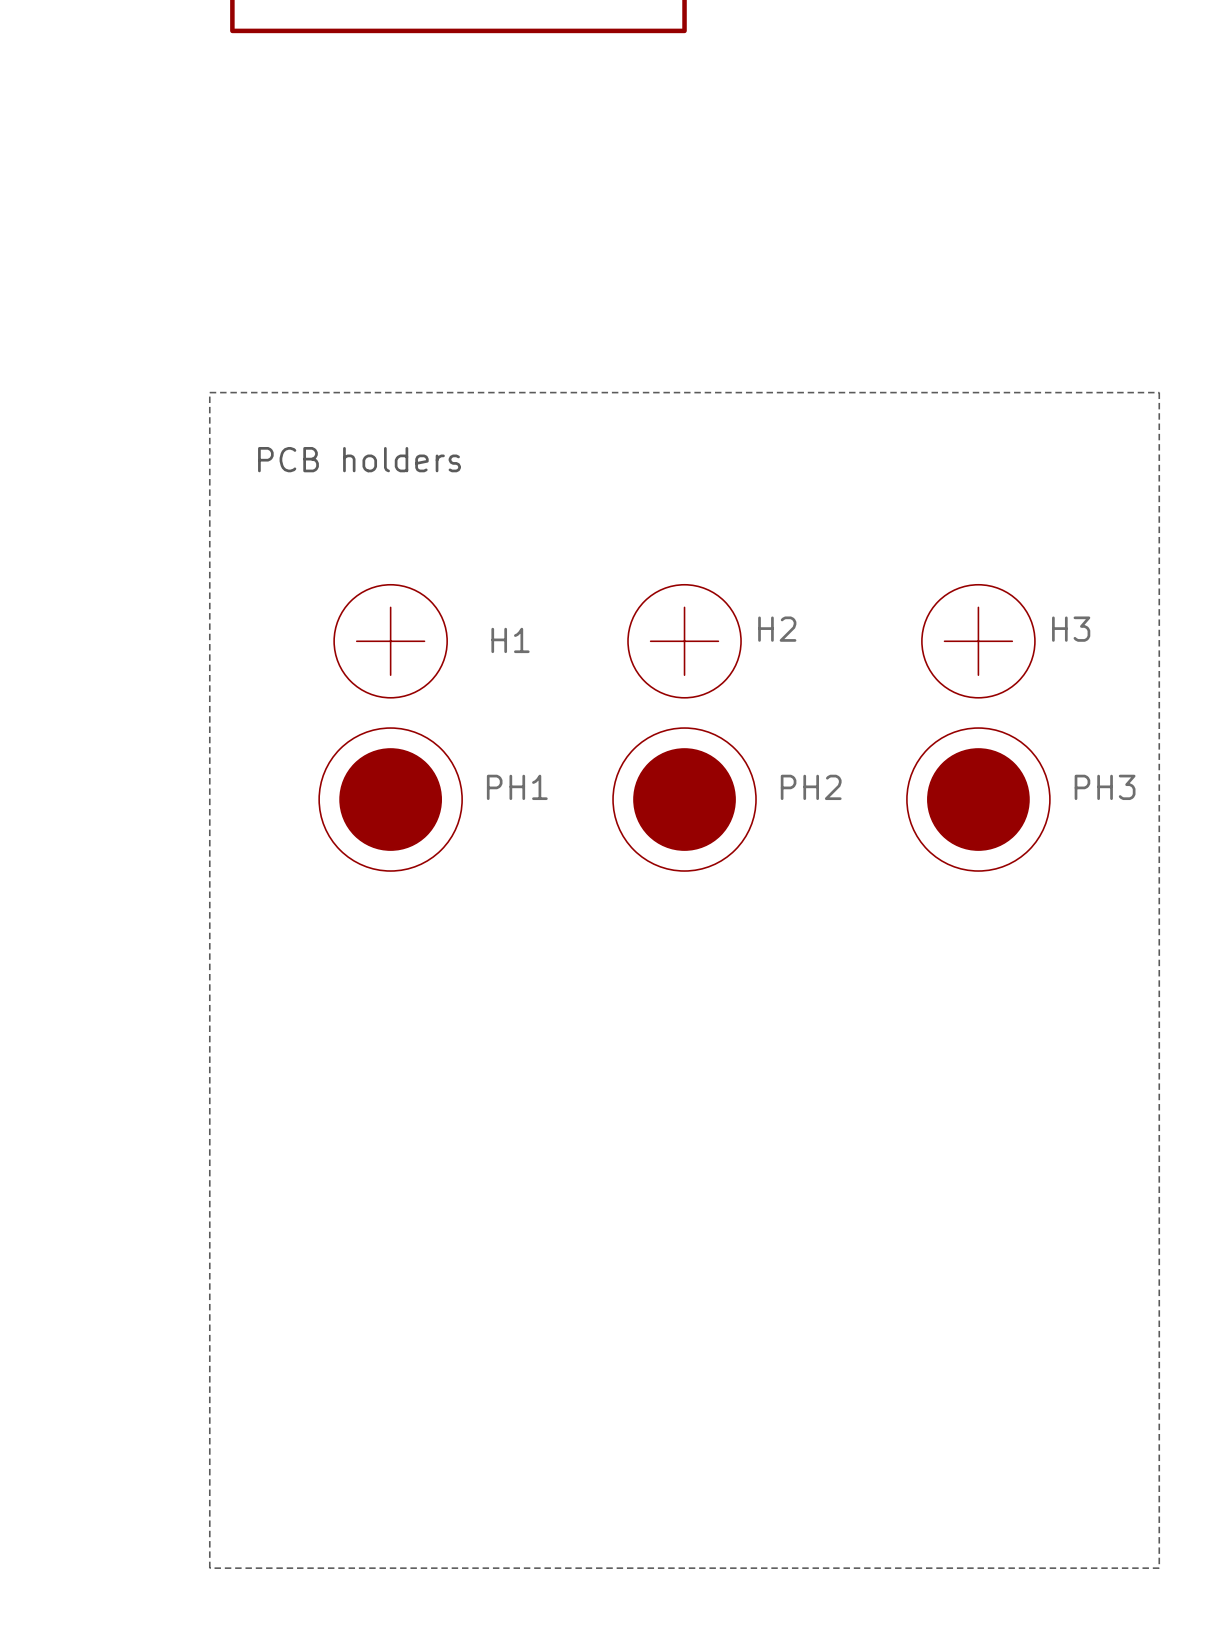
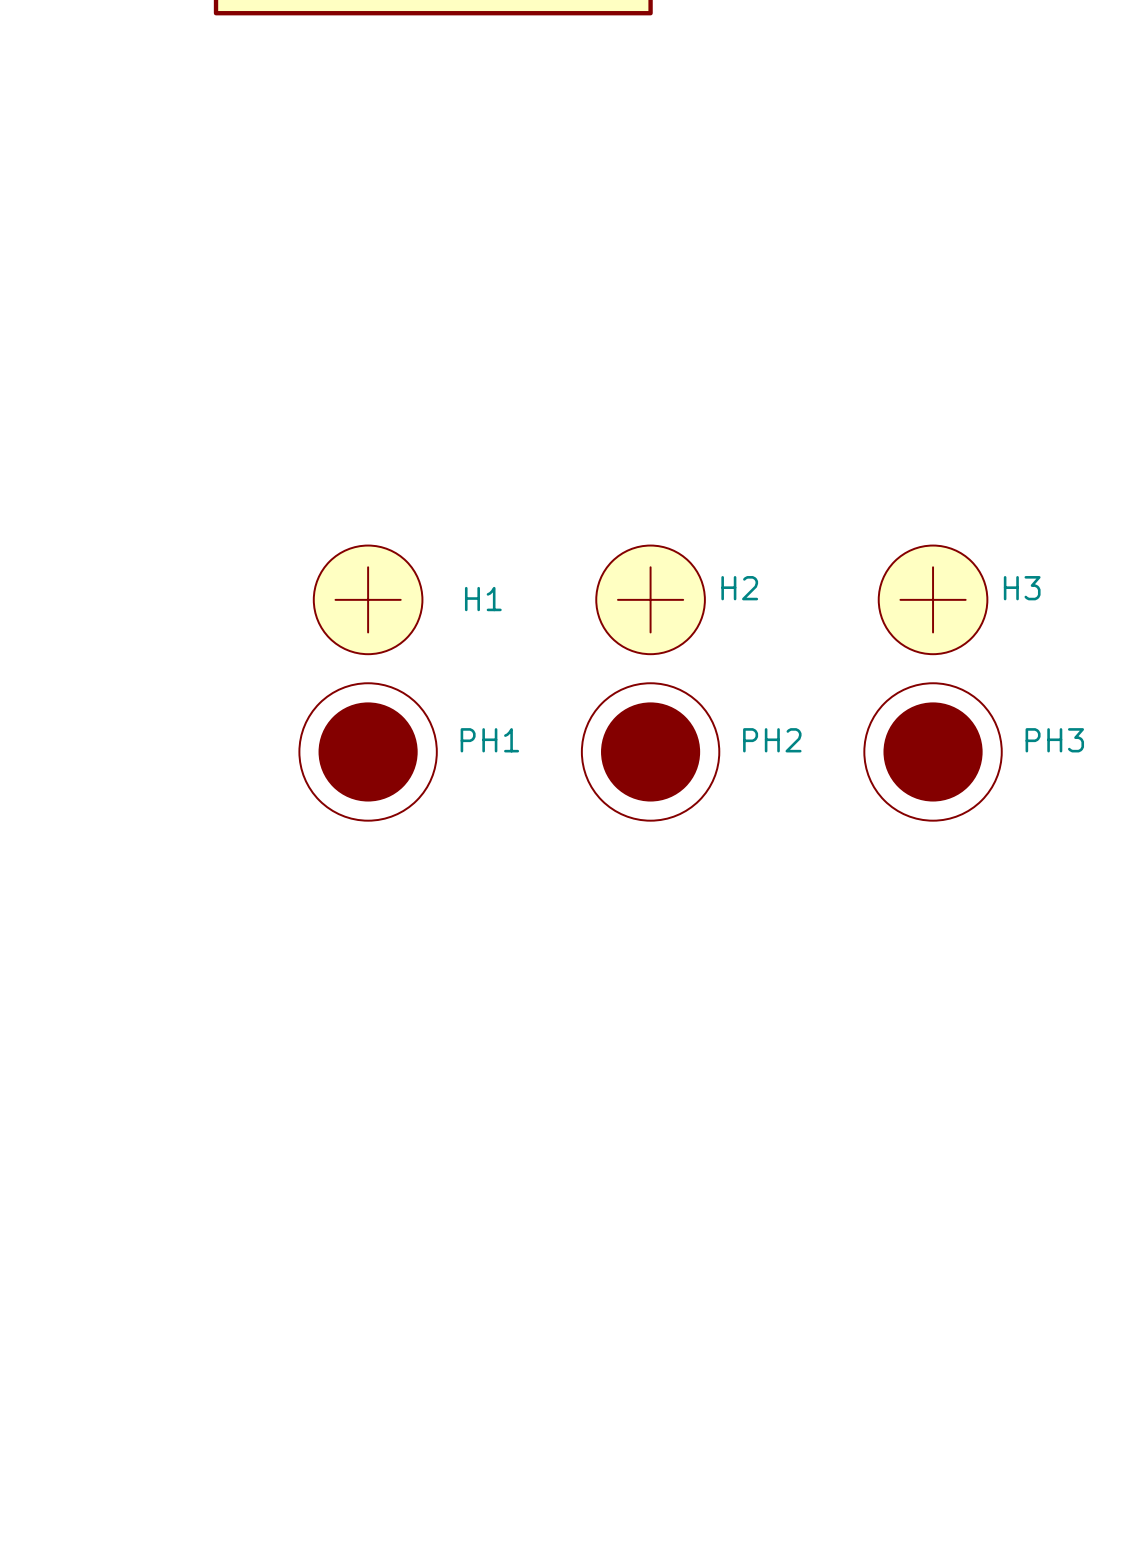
line: (209, 392) (1159, 392) (1159, 1568) (209, 1568) (209, 392) -> none
text: PCB holders (359, 459) -> none

